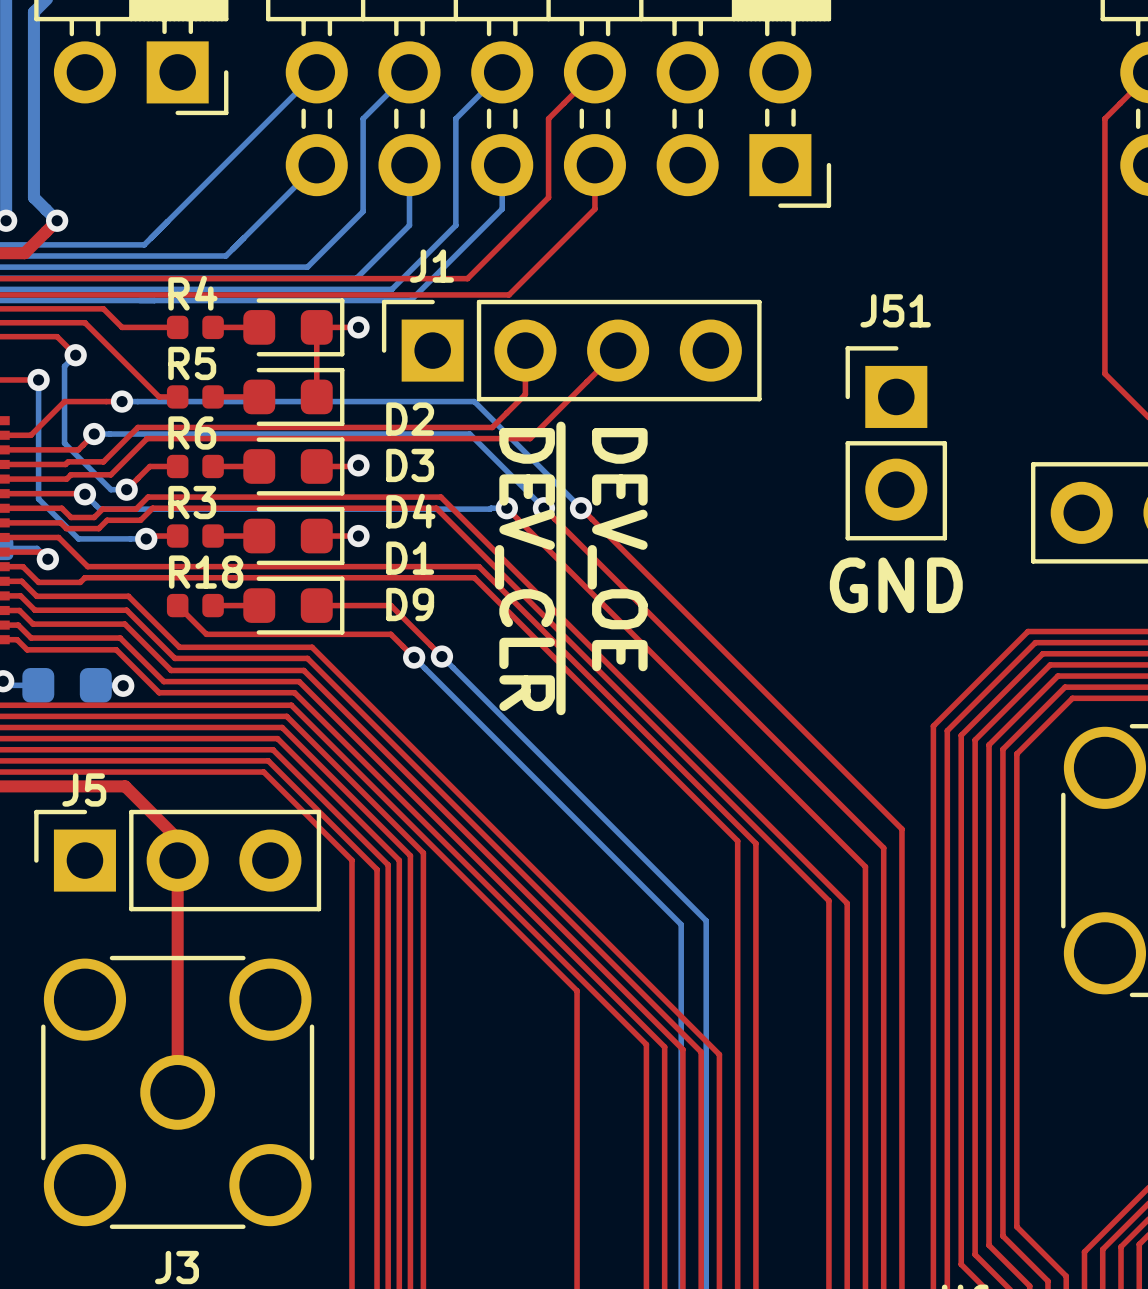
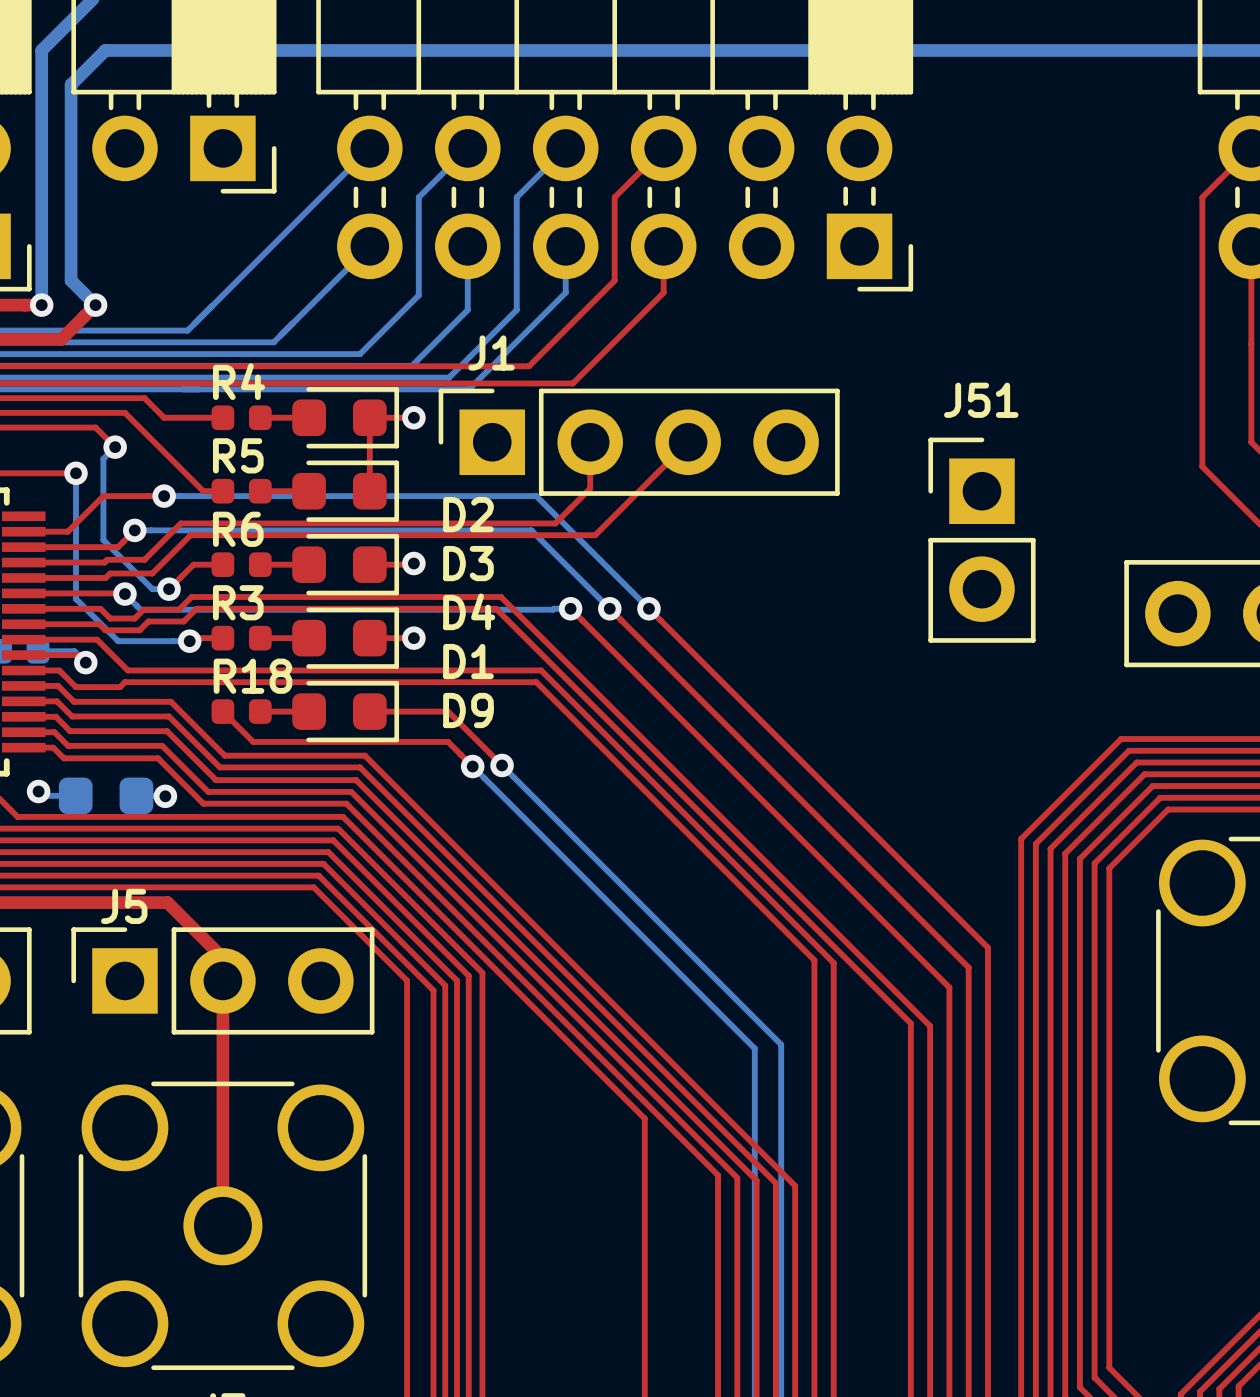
text: DEV_OE (617, 549) -> none
text: ~{DEV_CLR} (530, 568) -> none
text: GND (896, 585) -> none

